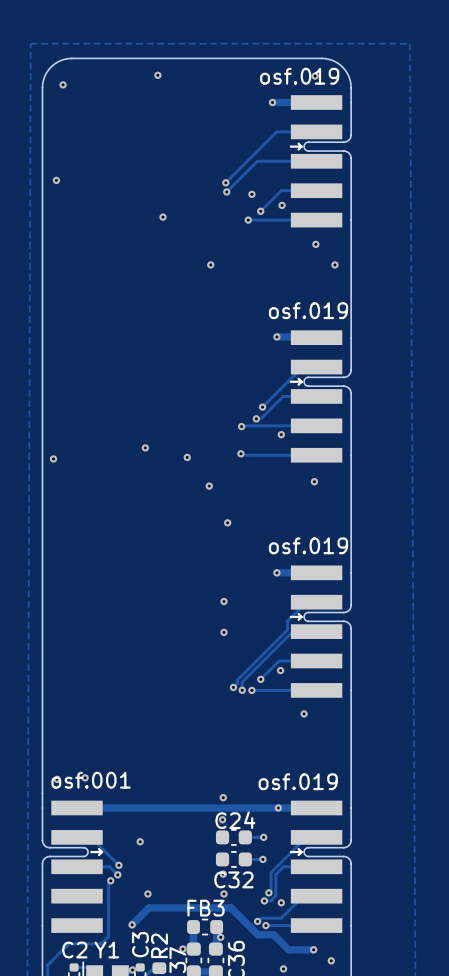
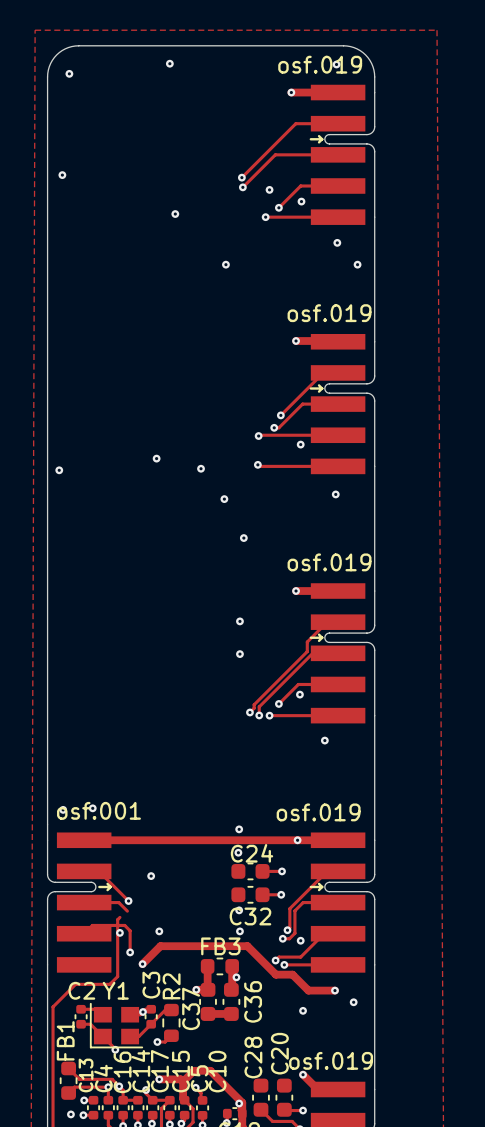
via: (117, 874) -> none
via: (110, 880) -> none
via: none -> (119, 932)
track: none -> (84, 933) (92, 925) (124, 925) (130, 930) (130, 952)
via: none -> (130, 952)

